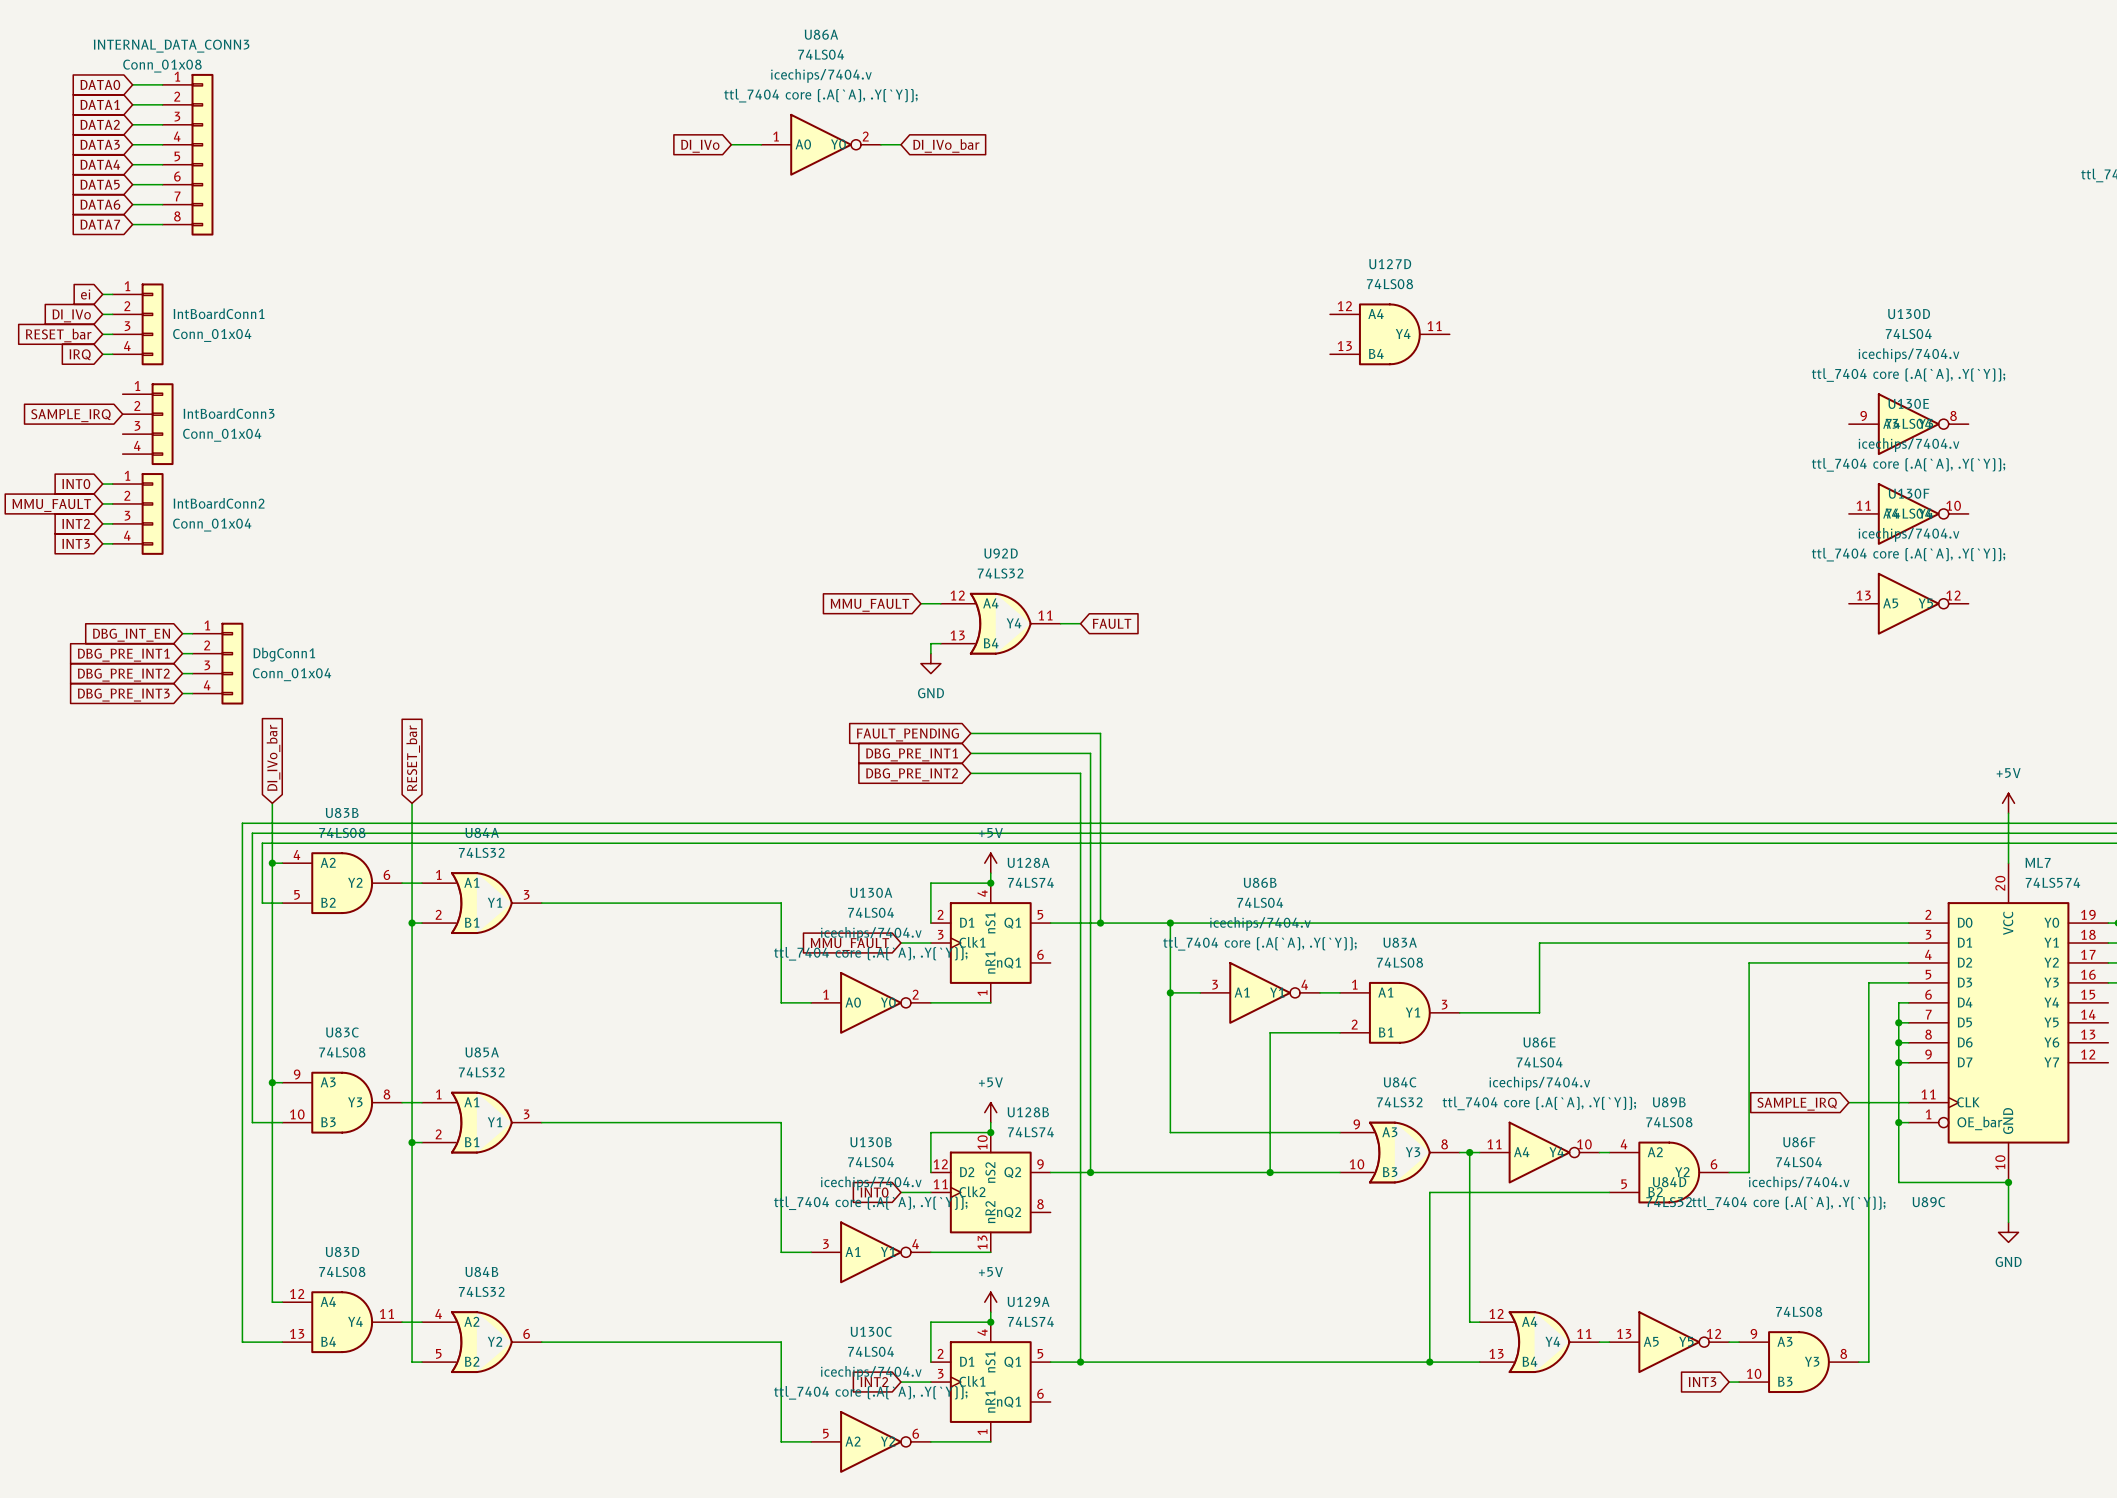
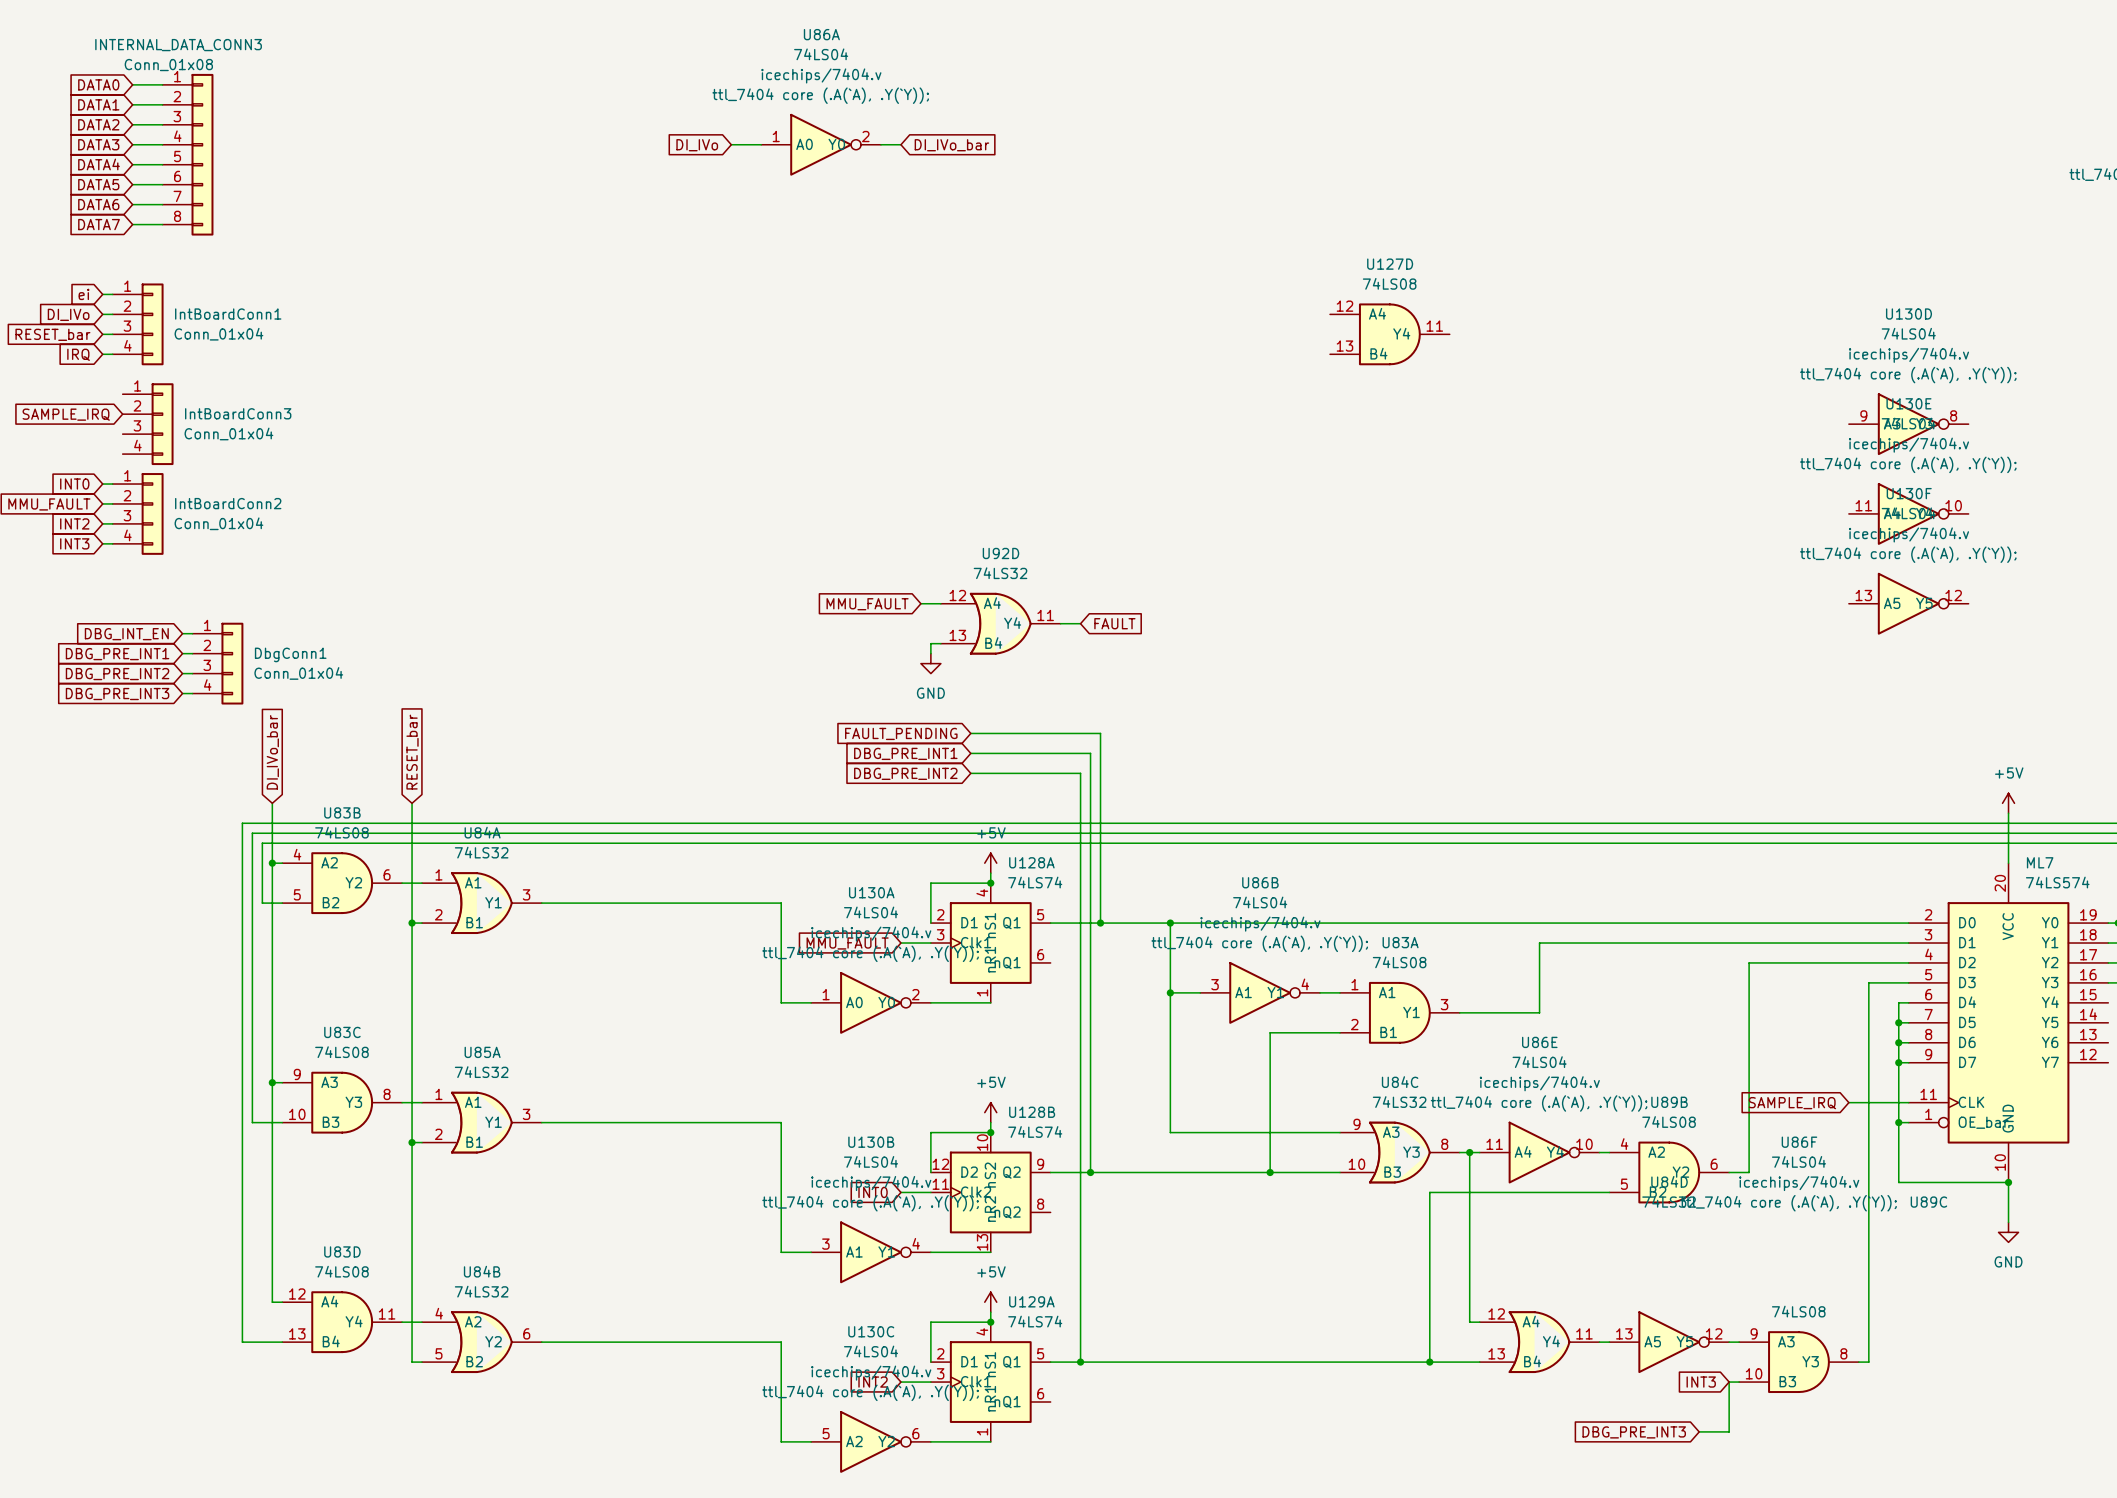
wire: none -> (1729, 1382) (1729, 1431) (1699, 1431)
global label: none -> DBG_PRE_INT3 (1634, 1432)

